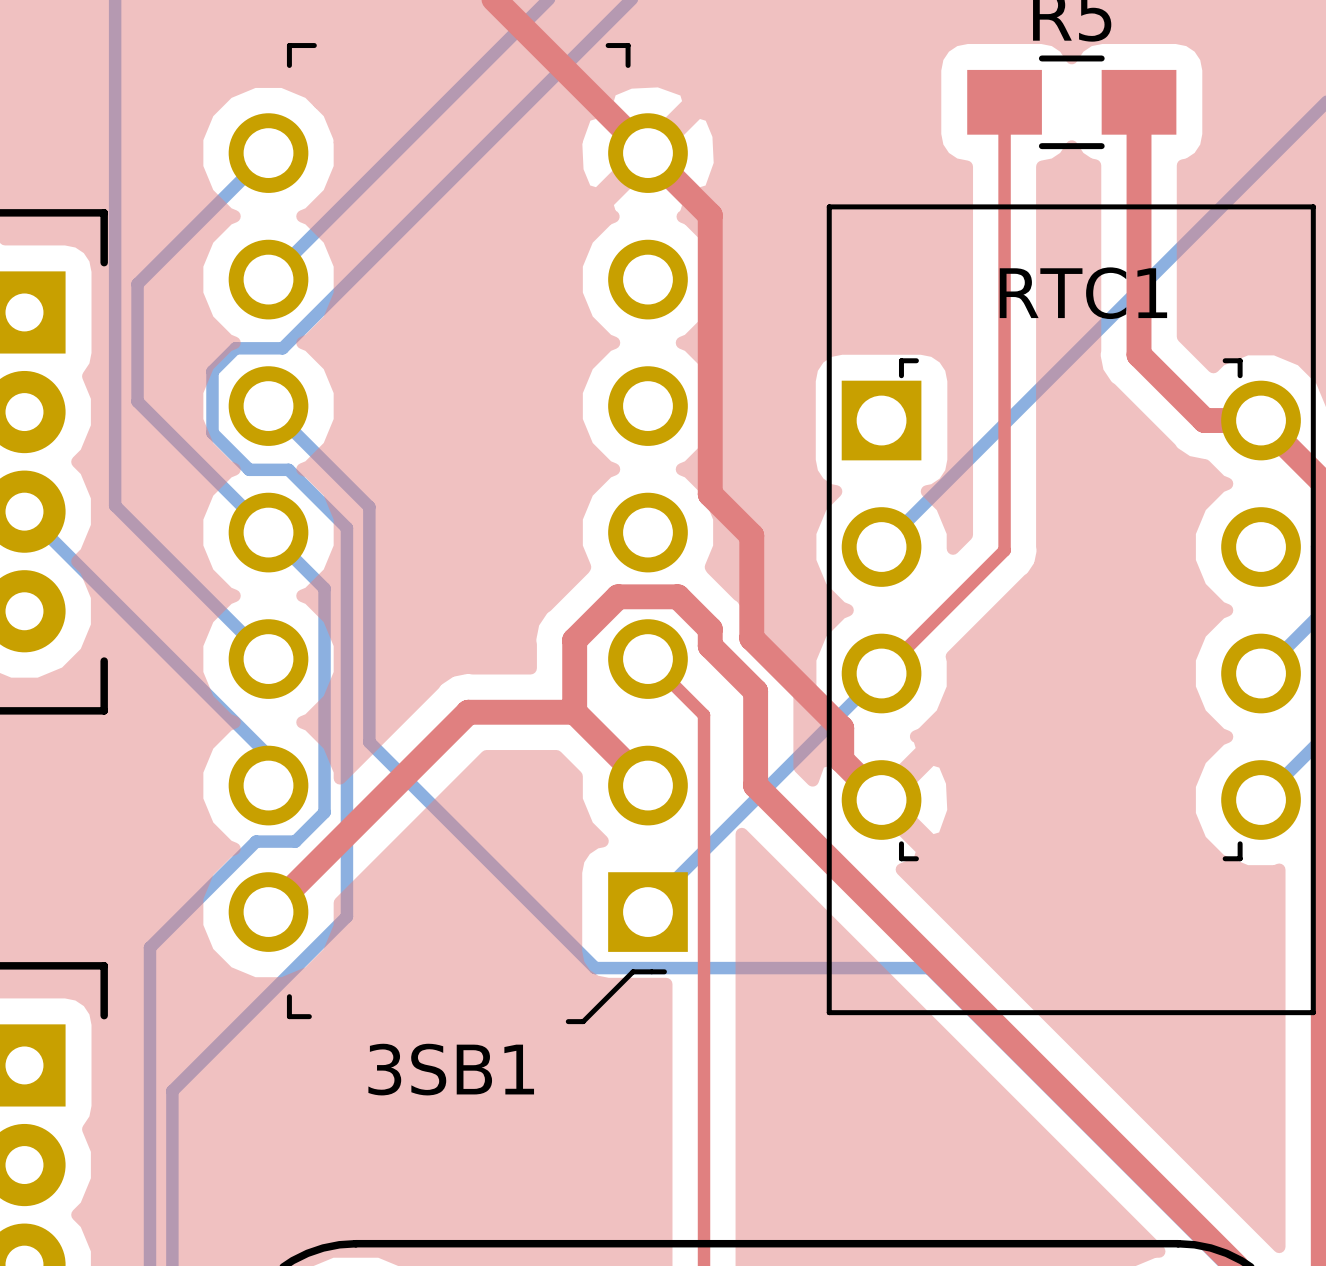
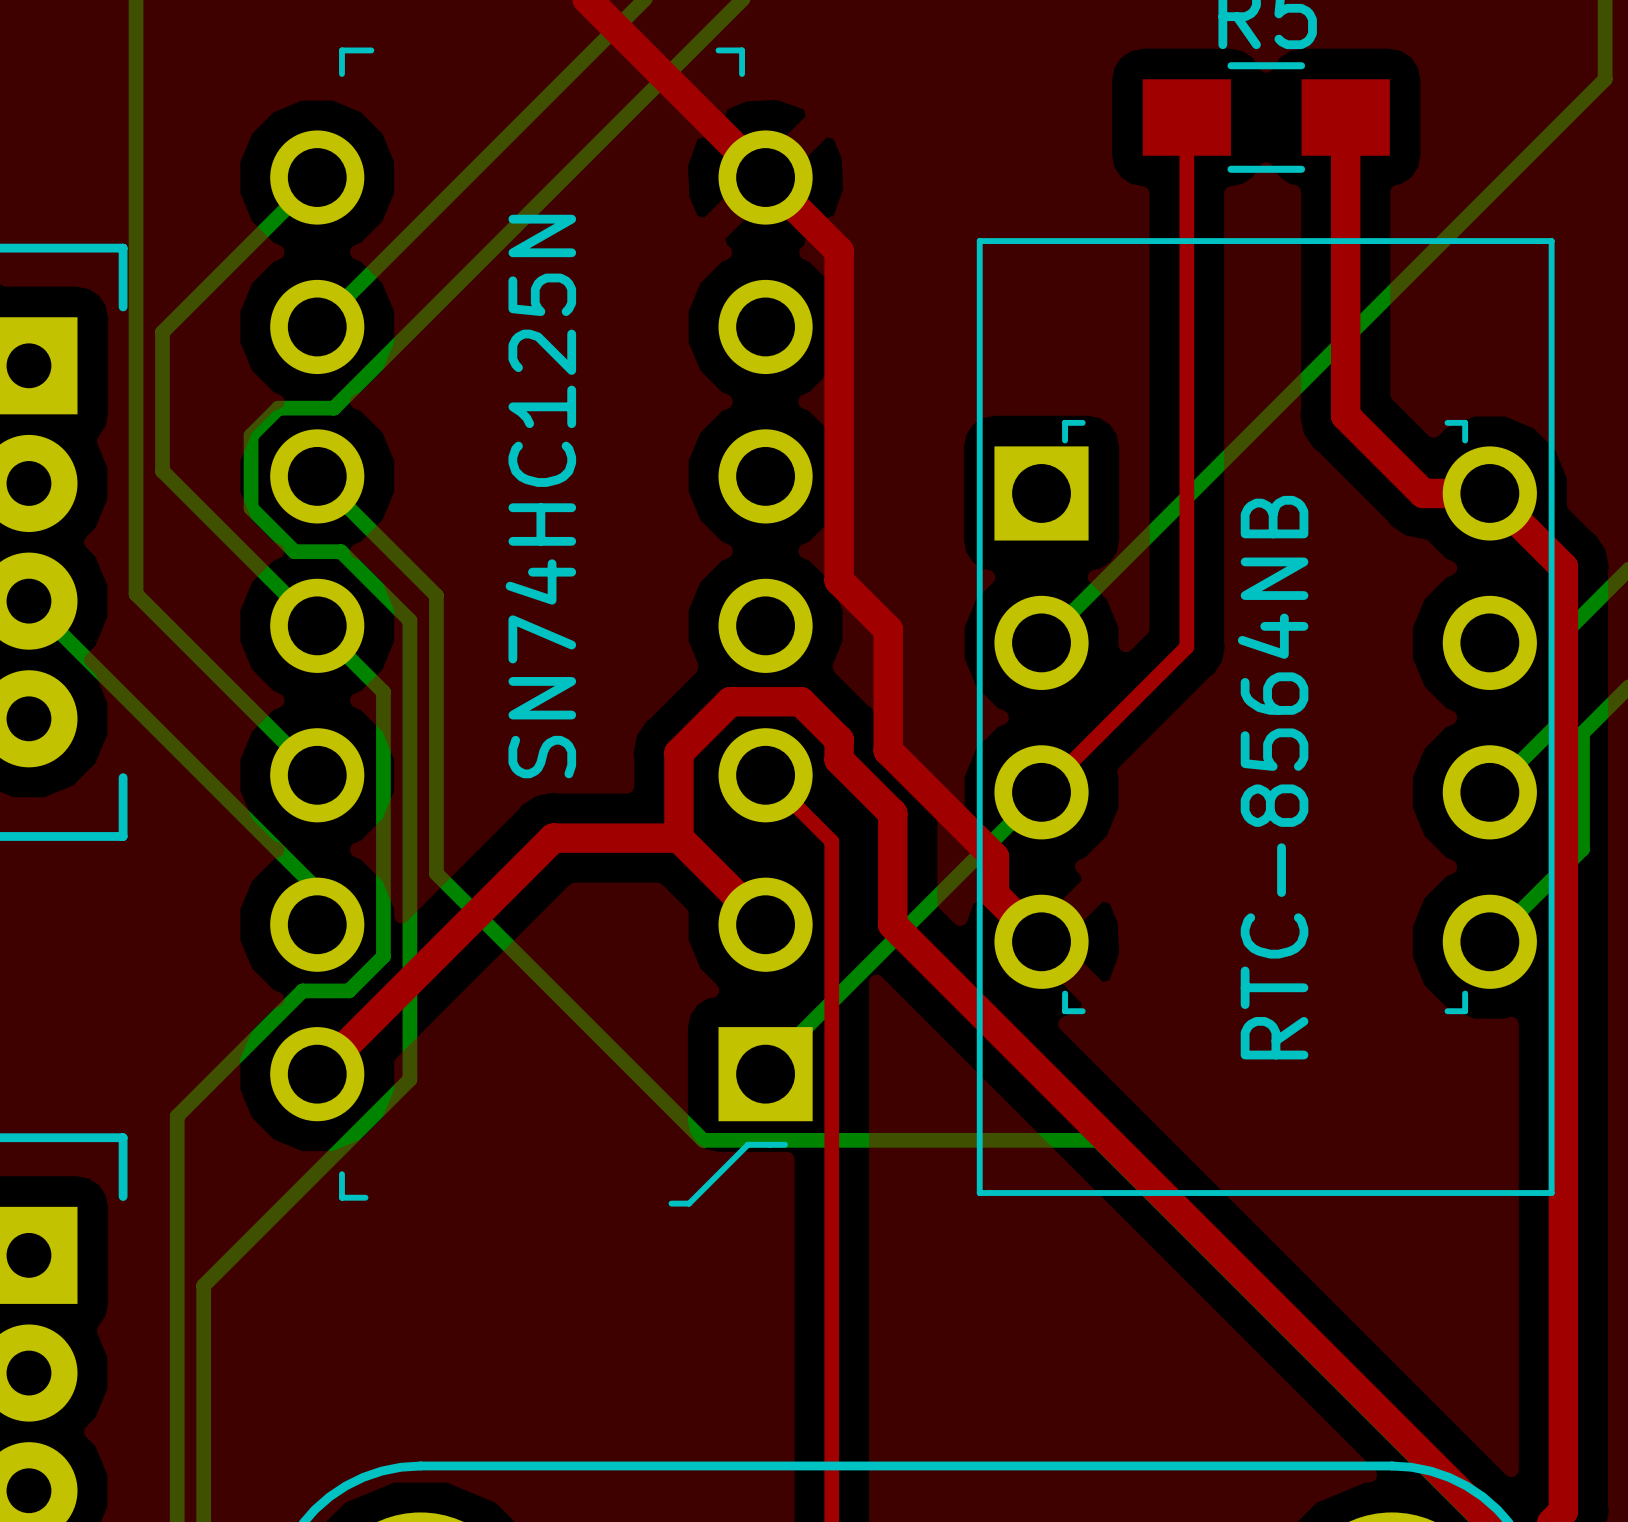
RTC1 name: RTC1 (1083, 293) -> RTC-8564NB (1273, 777)
3SB1 name: 3SB1 (451, 1069) -> SN74HC125N (540, 496)

